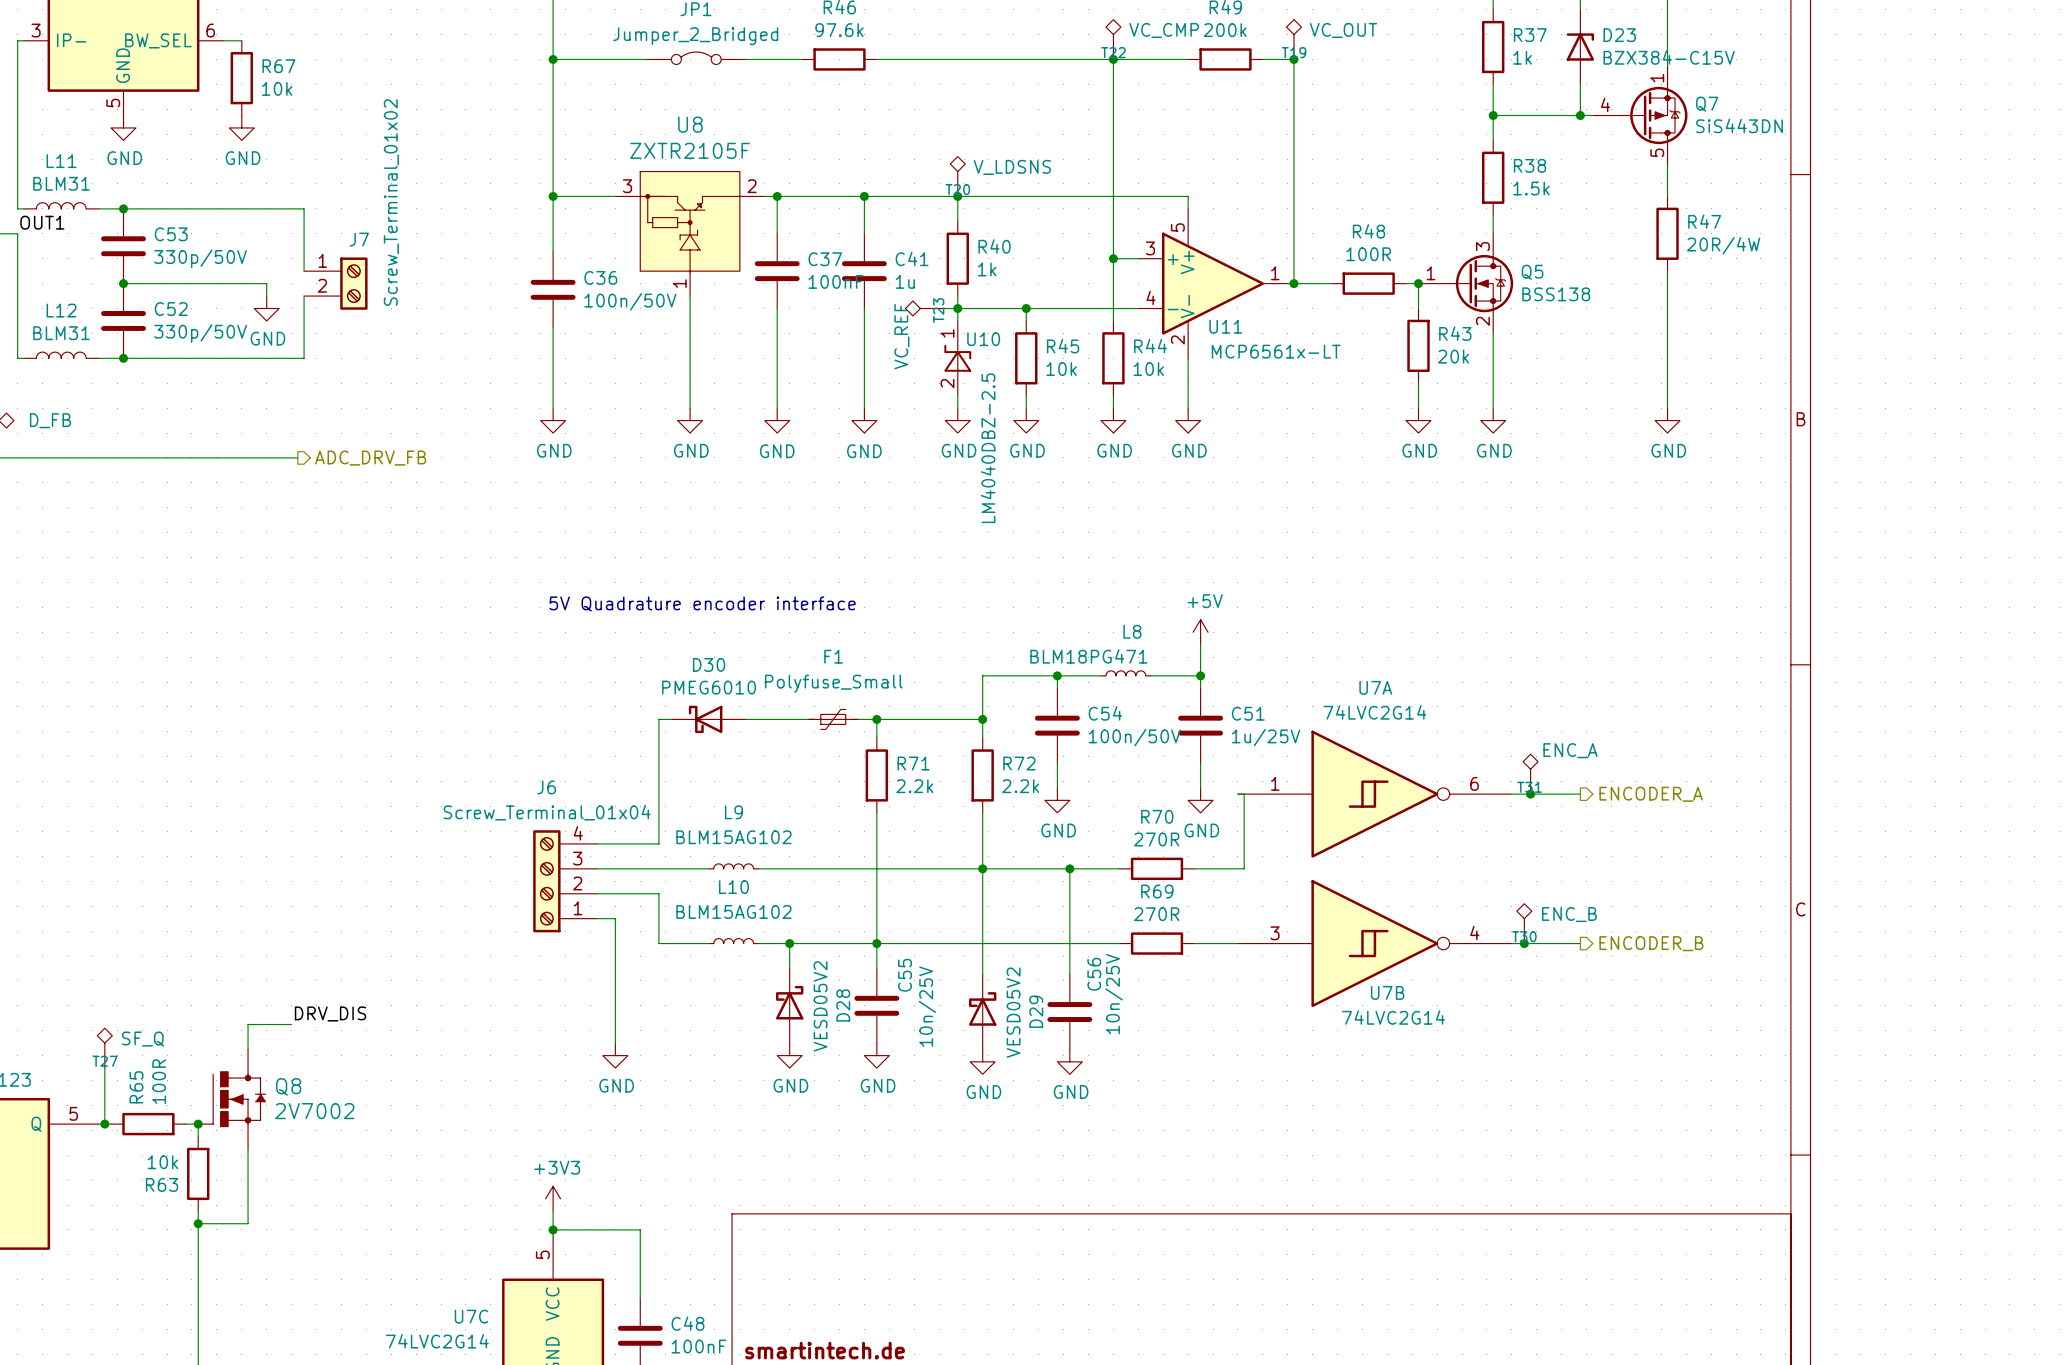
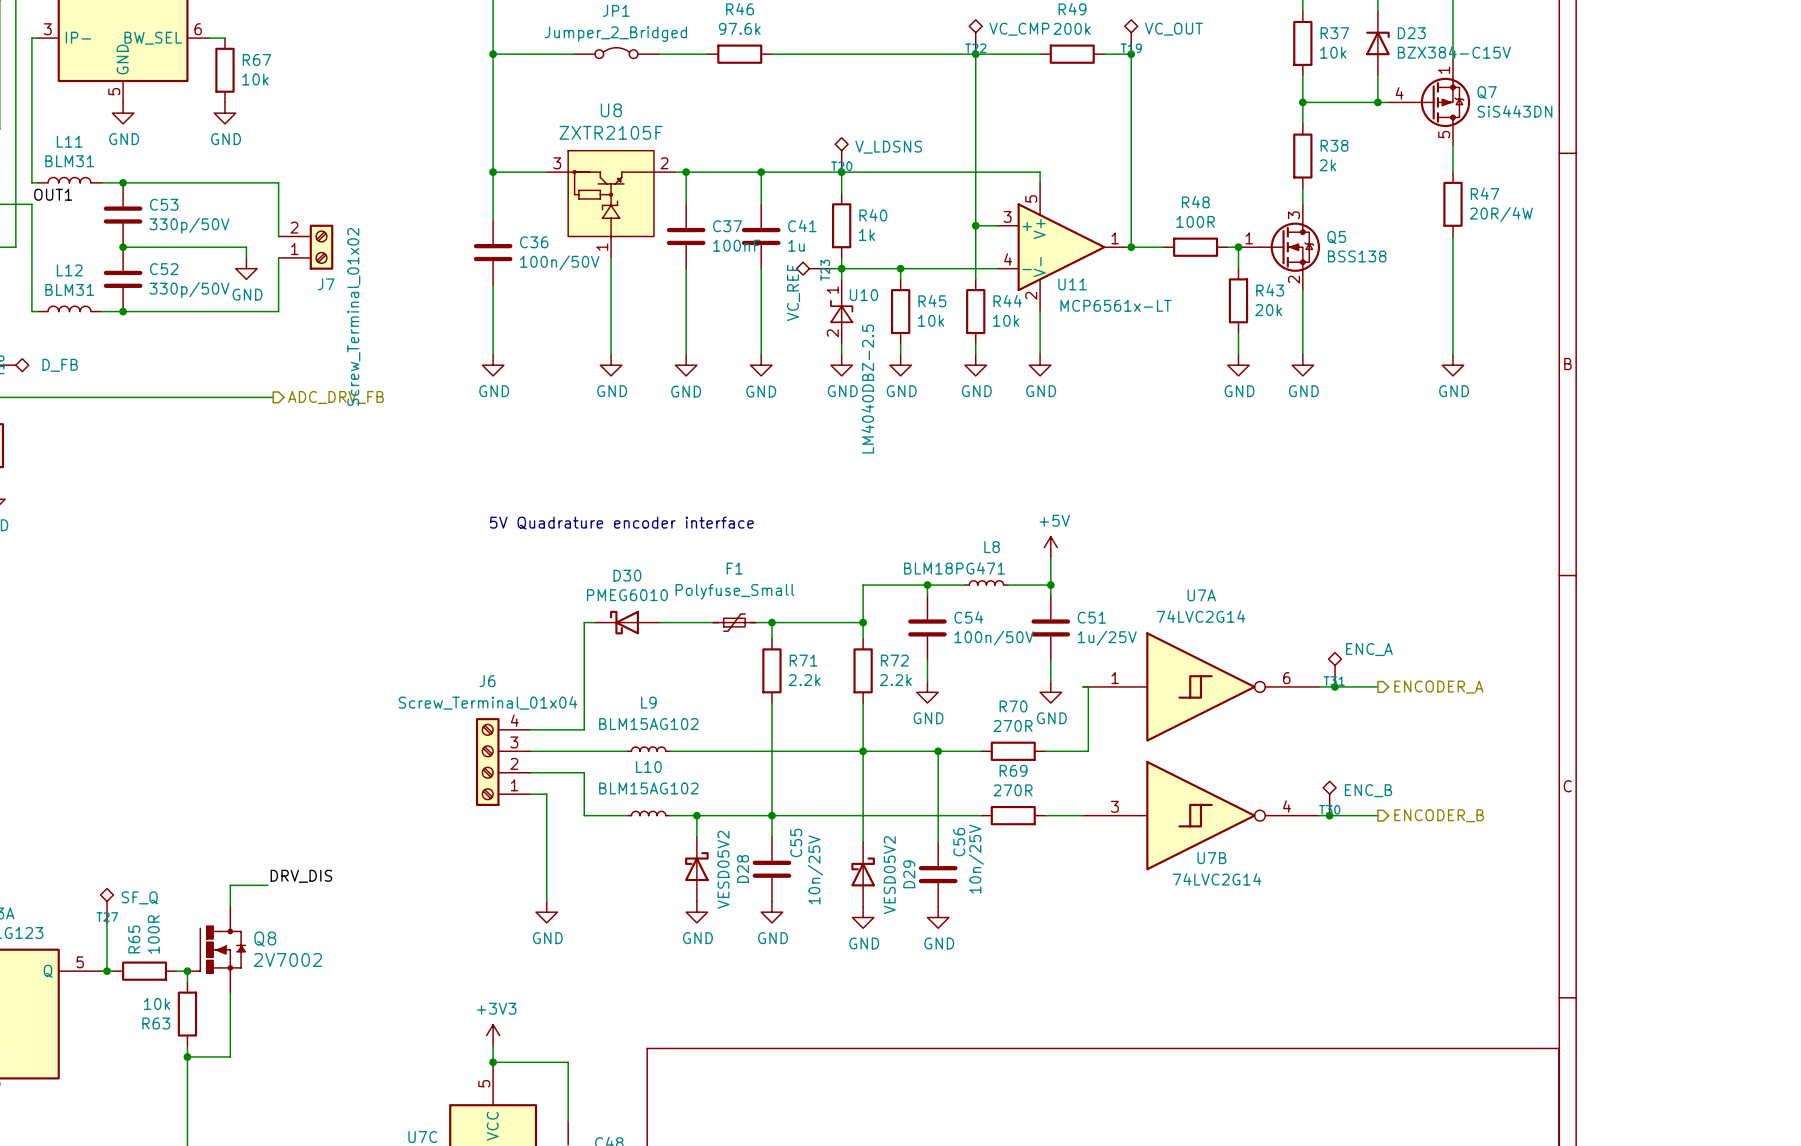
R37 value: 1k (1522, 57) -> 10k (1333, 52)
R38 value: 1.5k (1531, 188) -> 2k (1327, 165)
J7 flip: as is (353, 283) -> up-down (321, 247)

